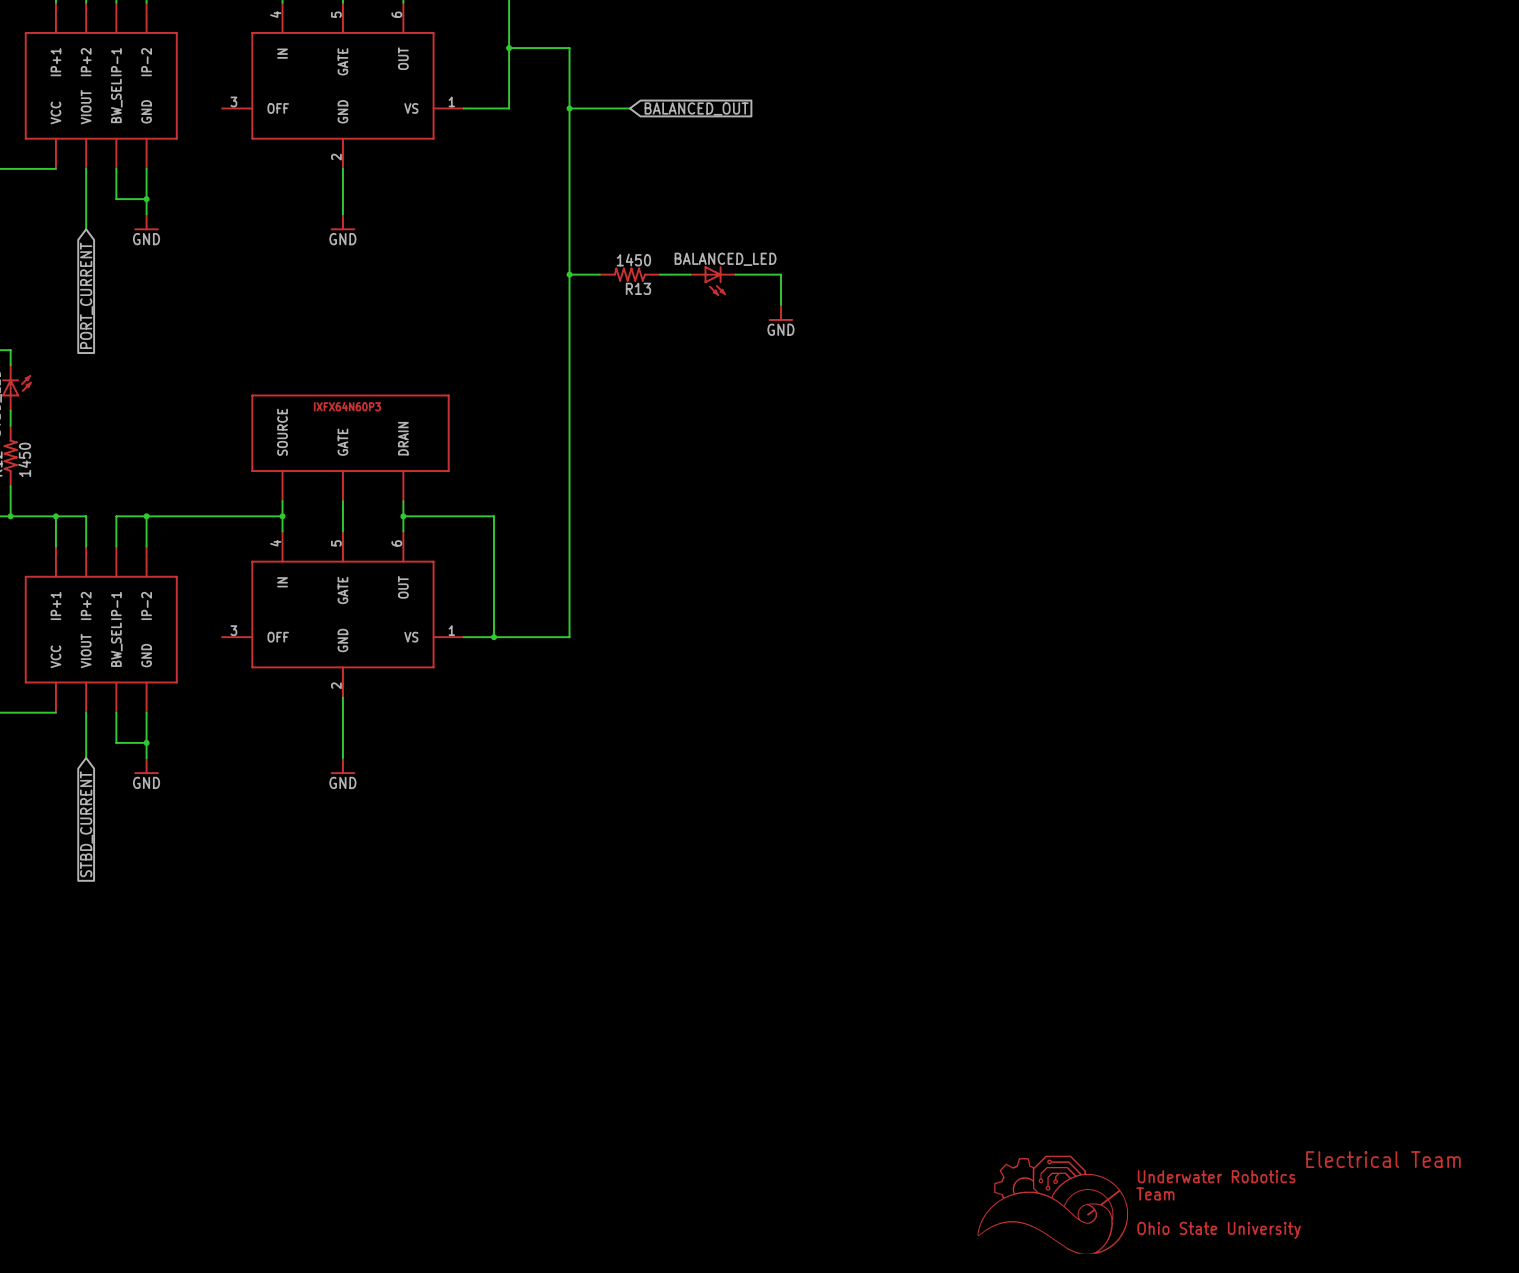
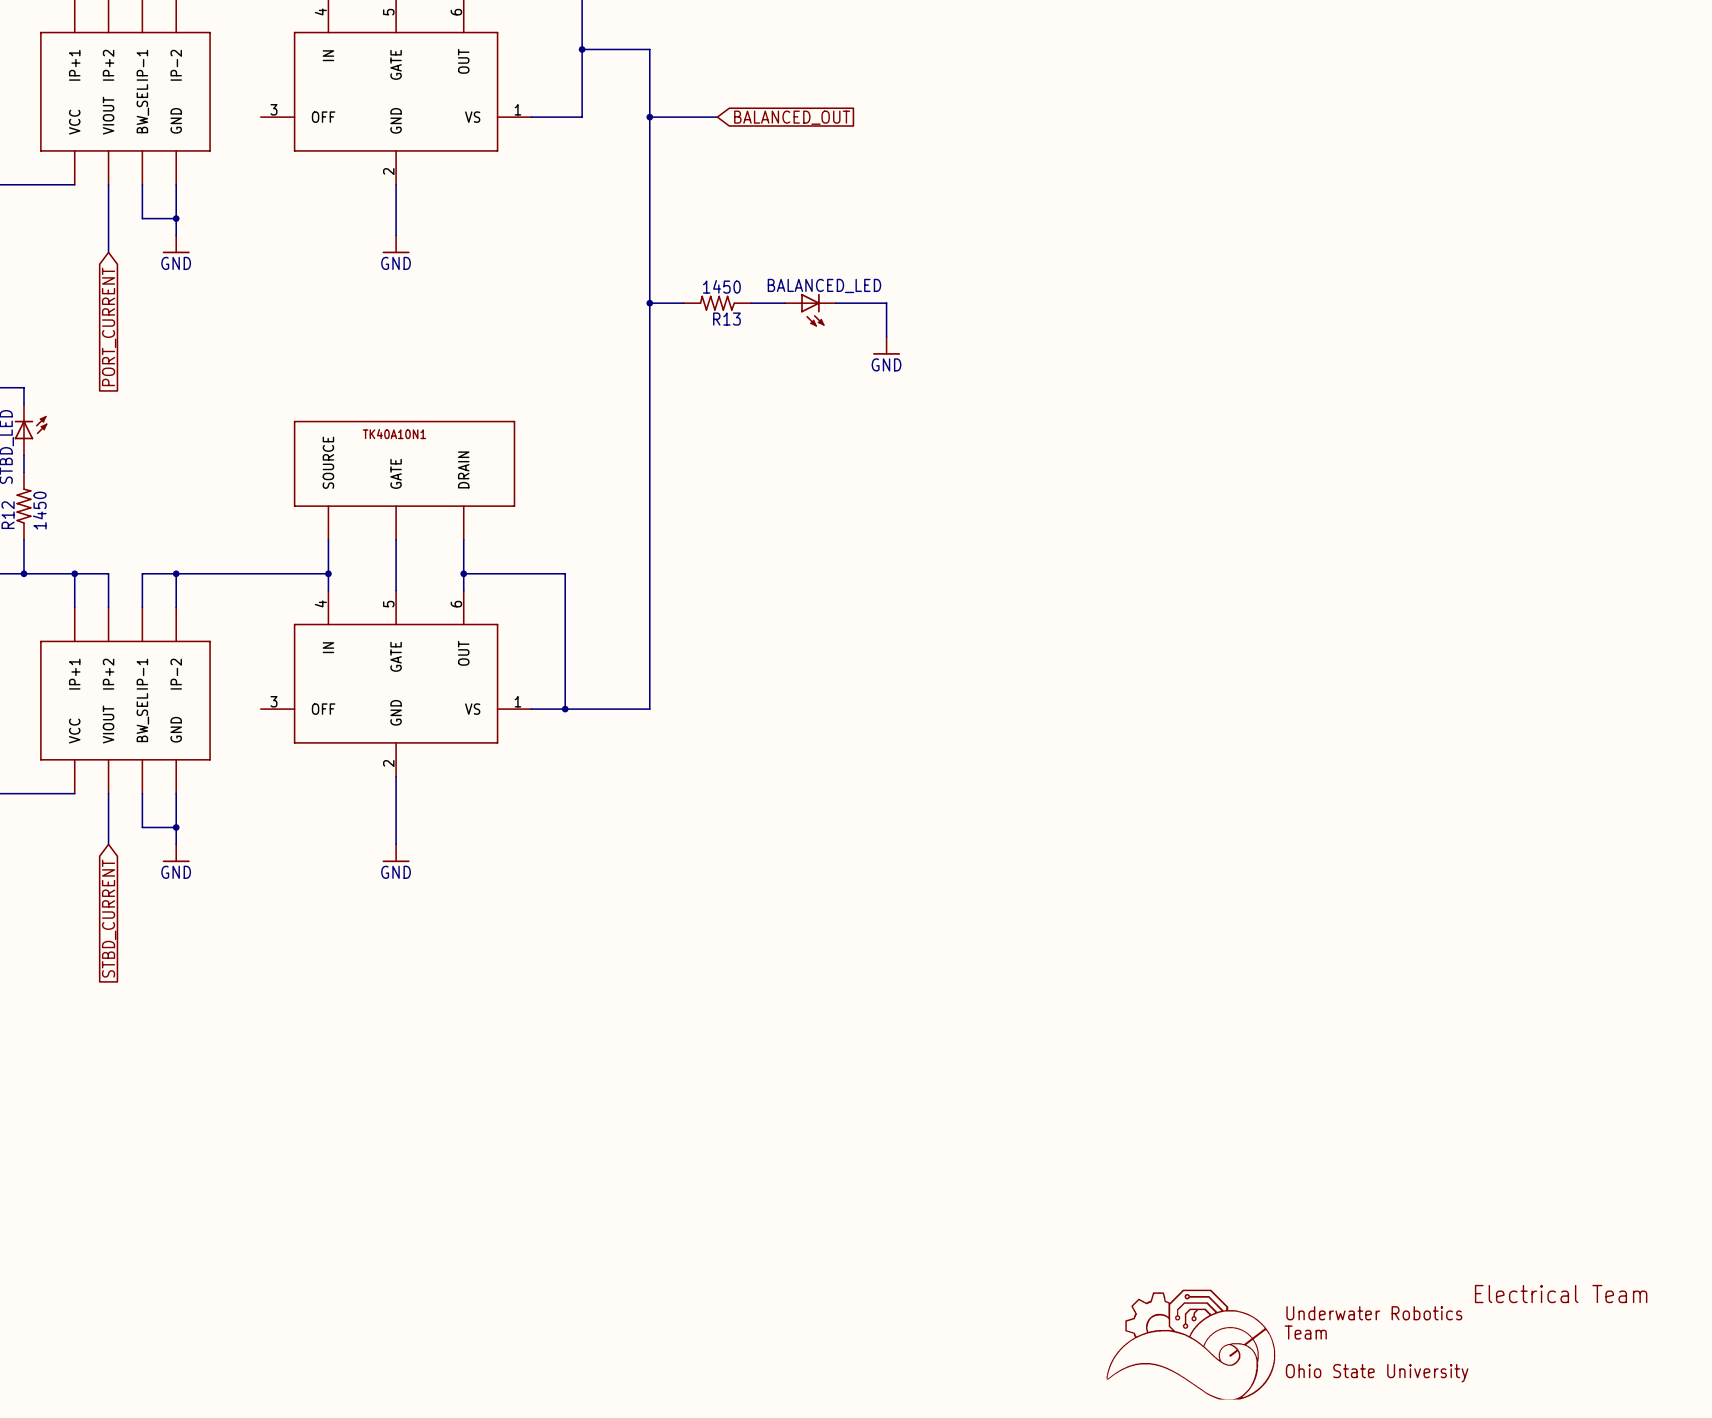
part: none -> (404, 480)
part: (350, 448) -> none

